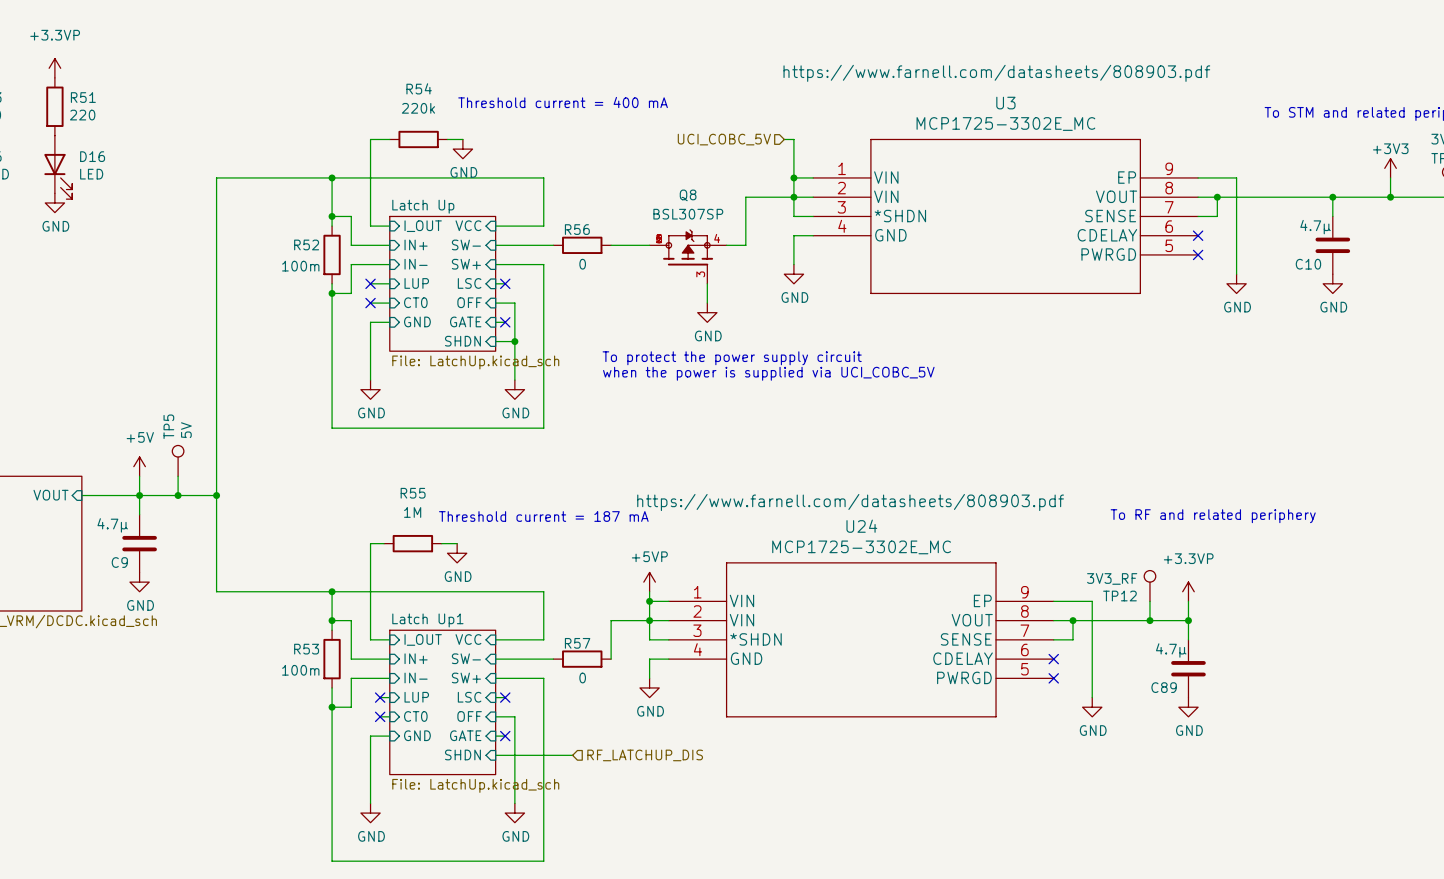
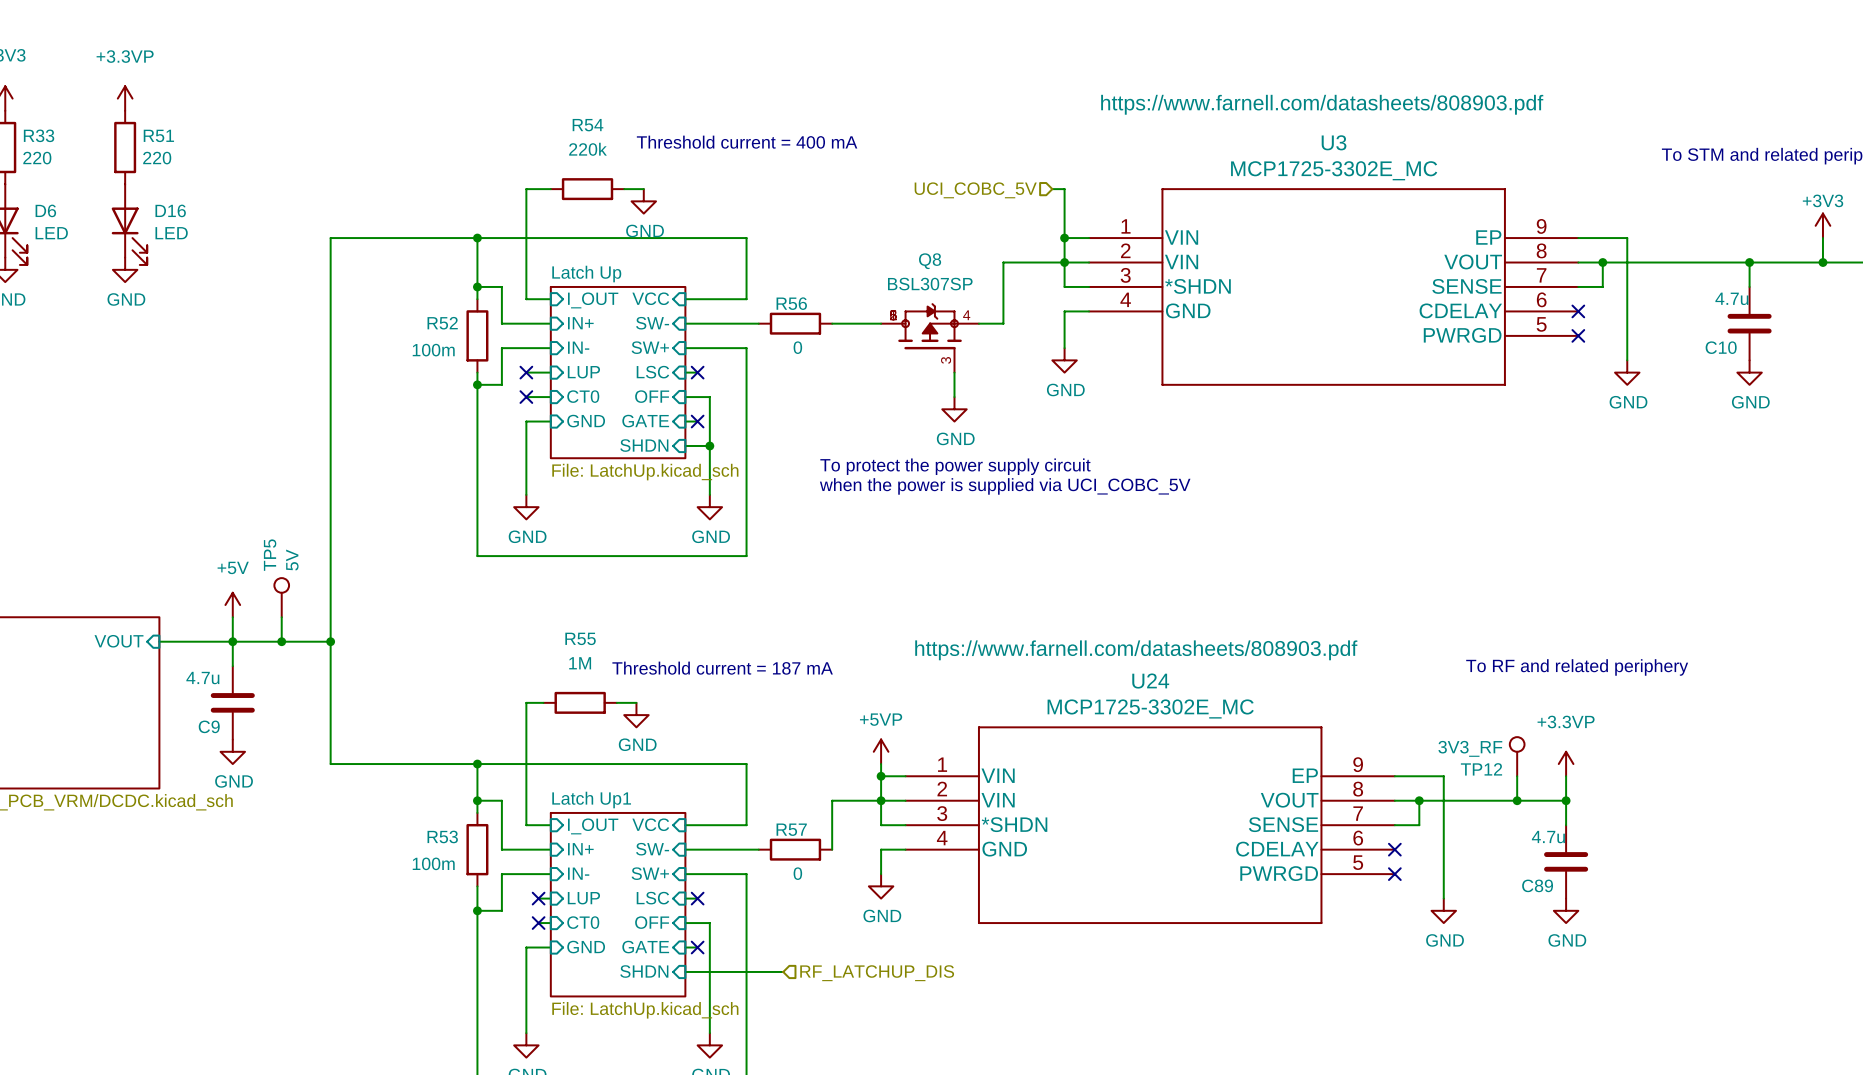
C10 value: 4.7µ (1315, 227) -> 4.7u (1731, 298)
C9 value: 4.7µ (112, 525) -> 4.7u (202, 678)
C89 value: 4.7µ (1171, 650) -> 4.7u (1548, 837)

